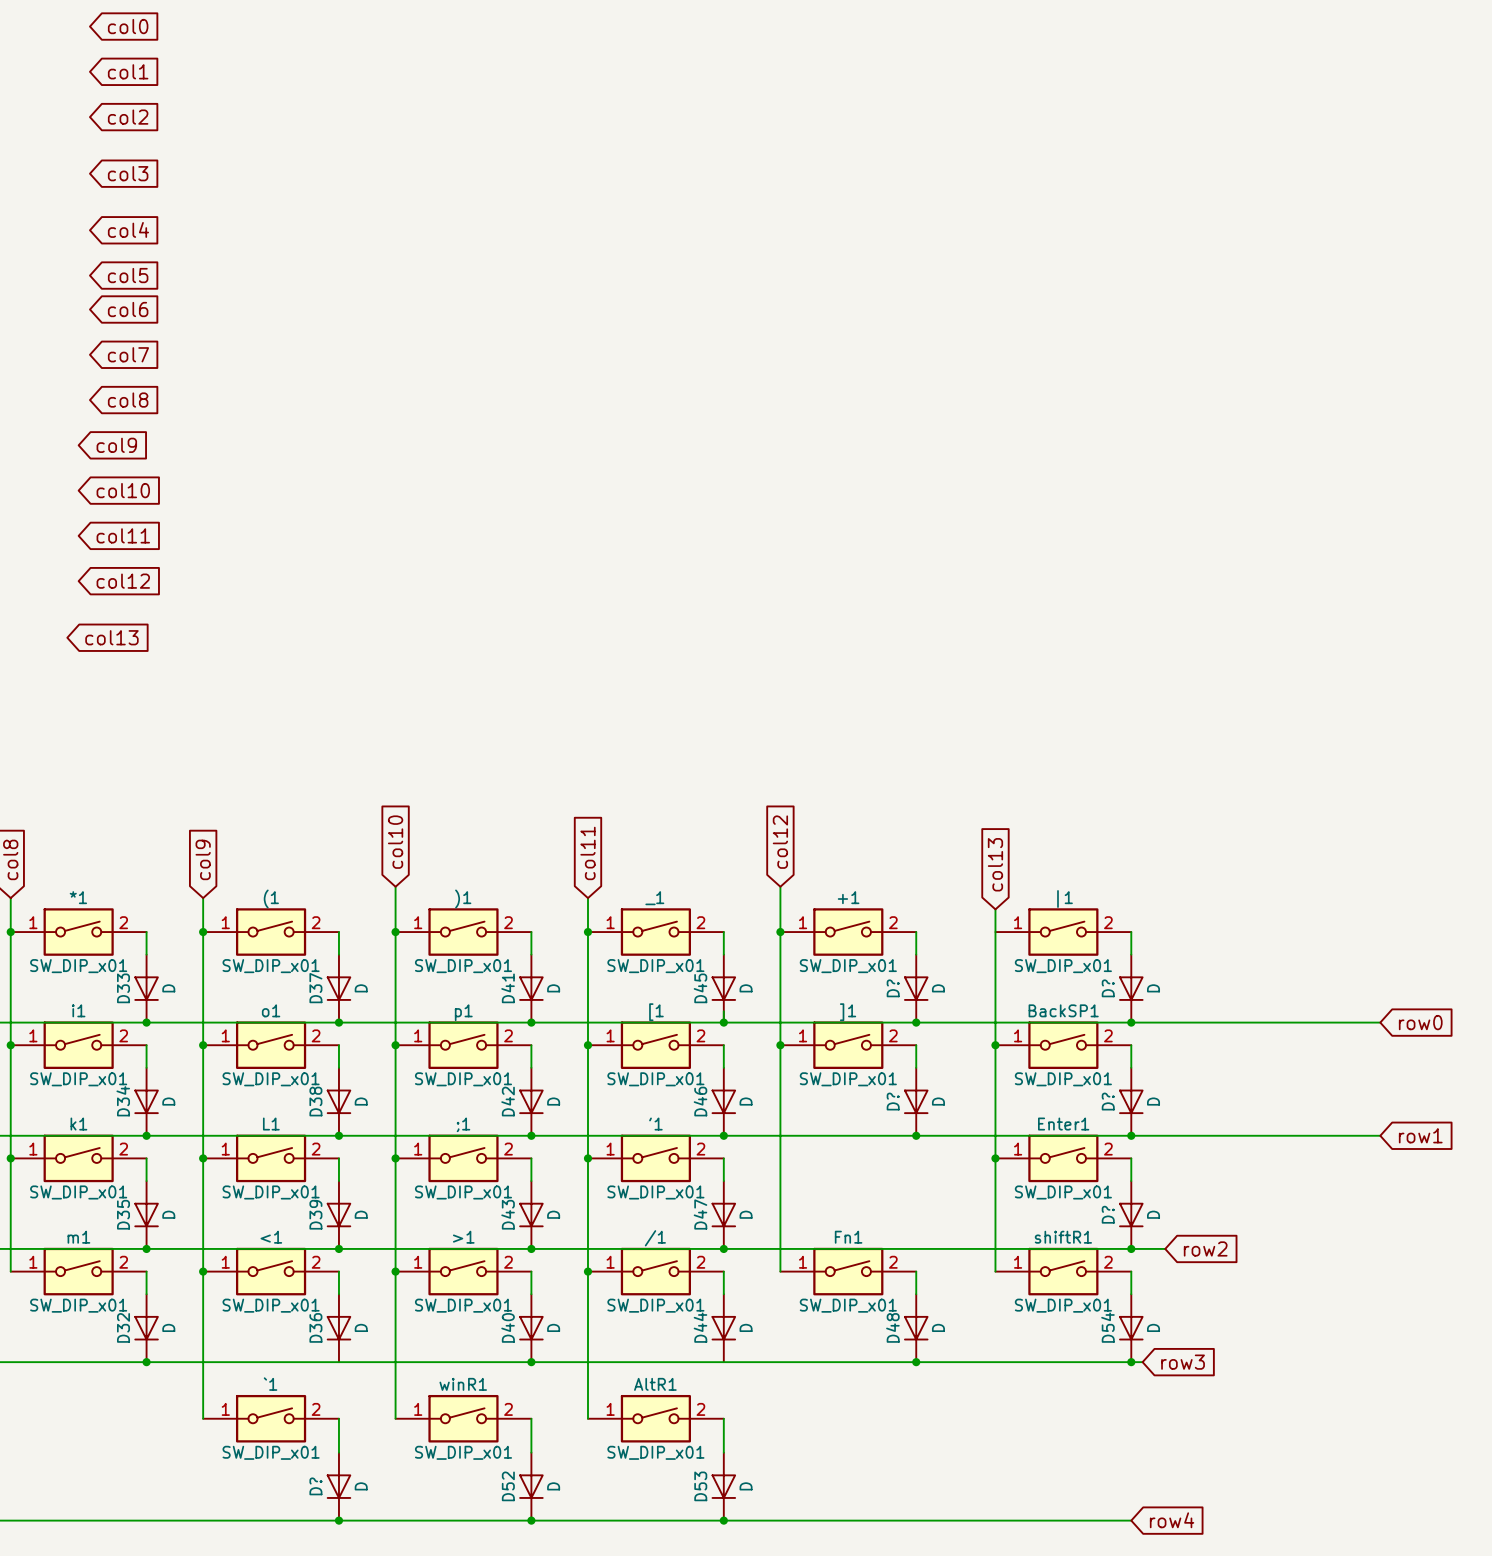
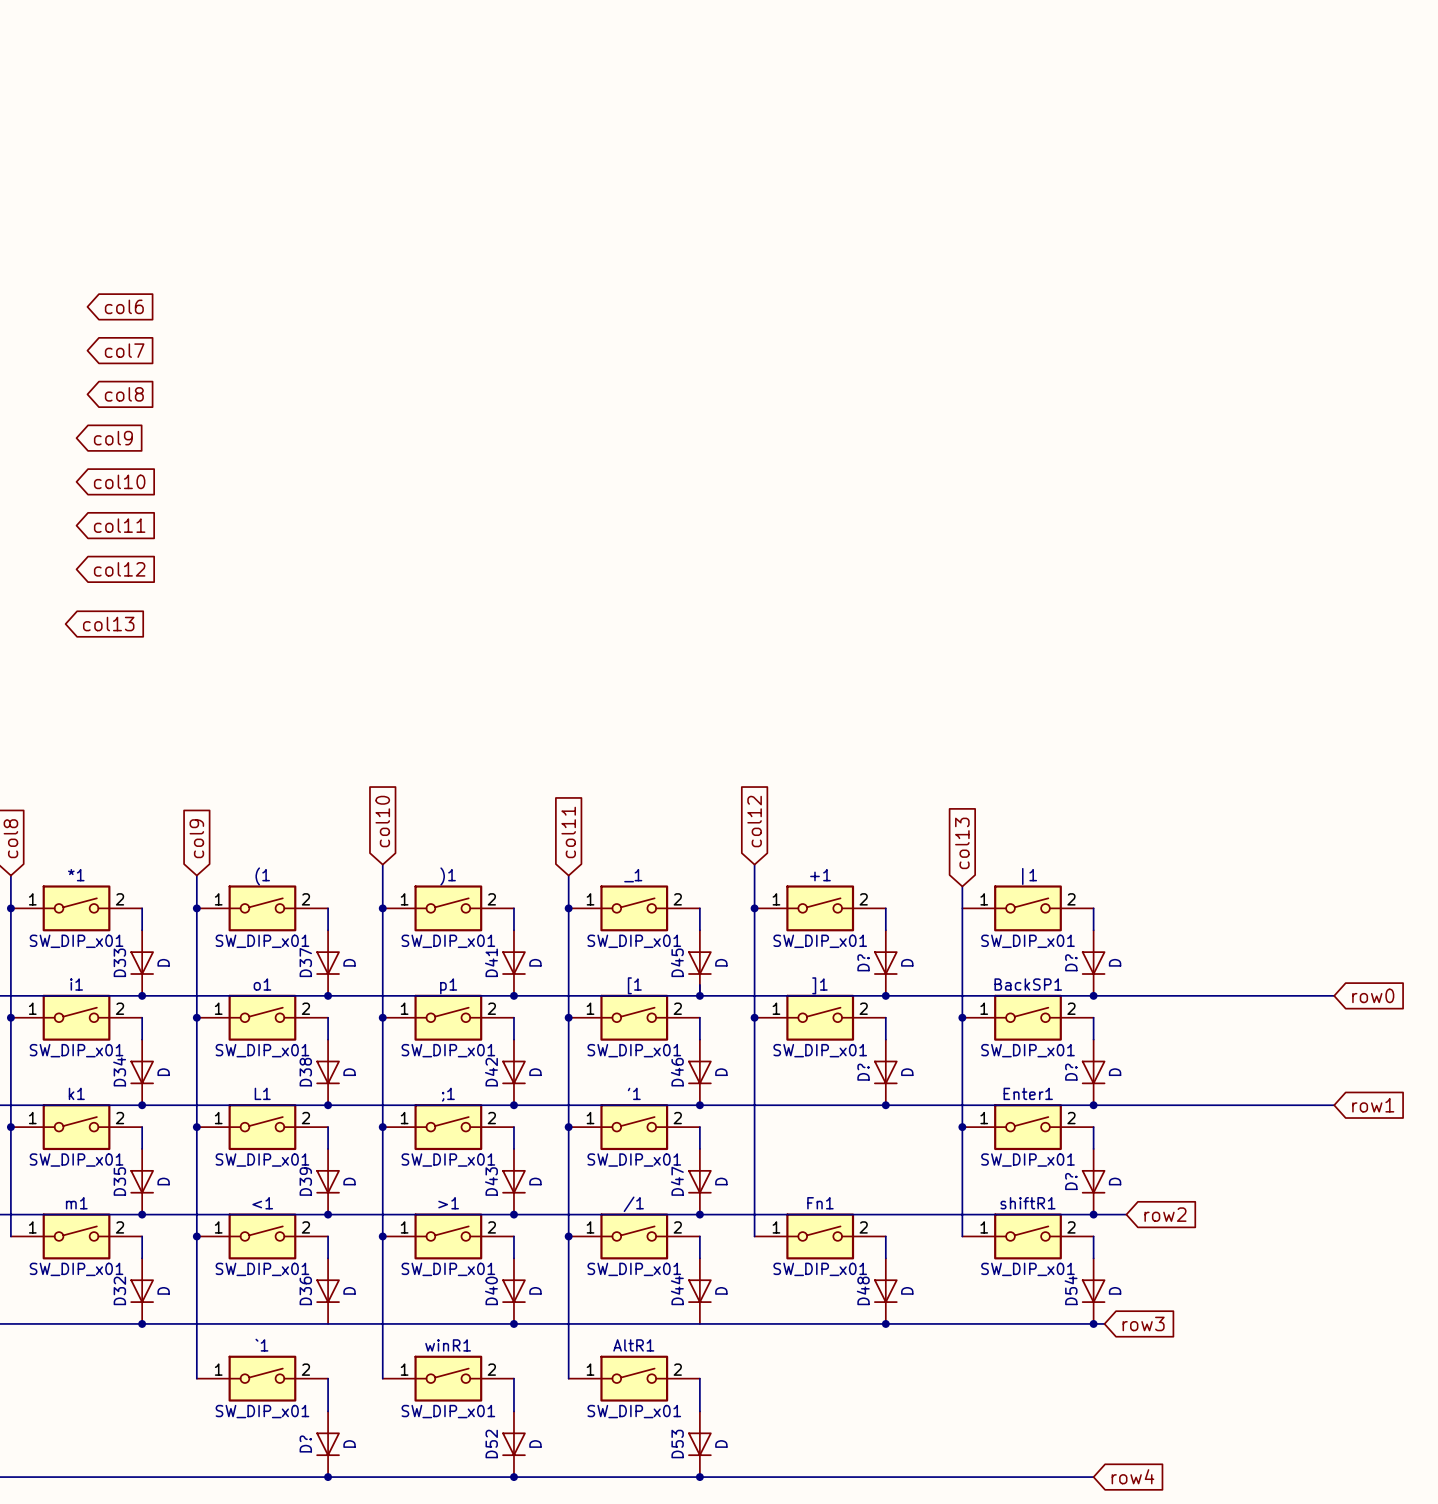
global label: col0 (128, 26) -> none
global label: col1 (128, 71) -> none
global label: col2 (128, 117) -> none
global label: col3 (128, 173) -> none
global label: col4 (128, 229) -> none
global label: col5 (128, 275) -> none

